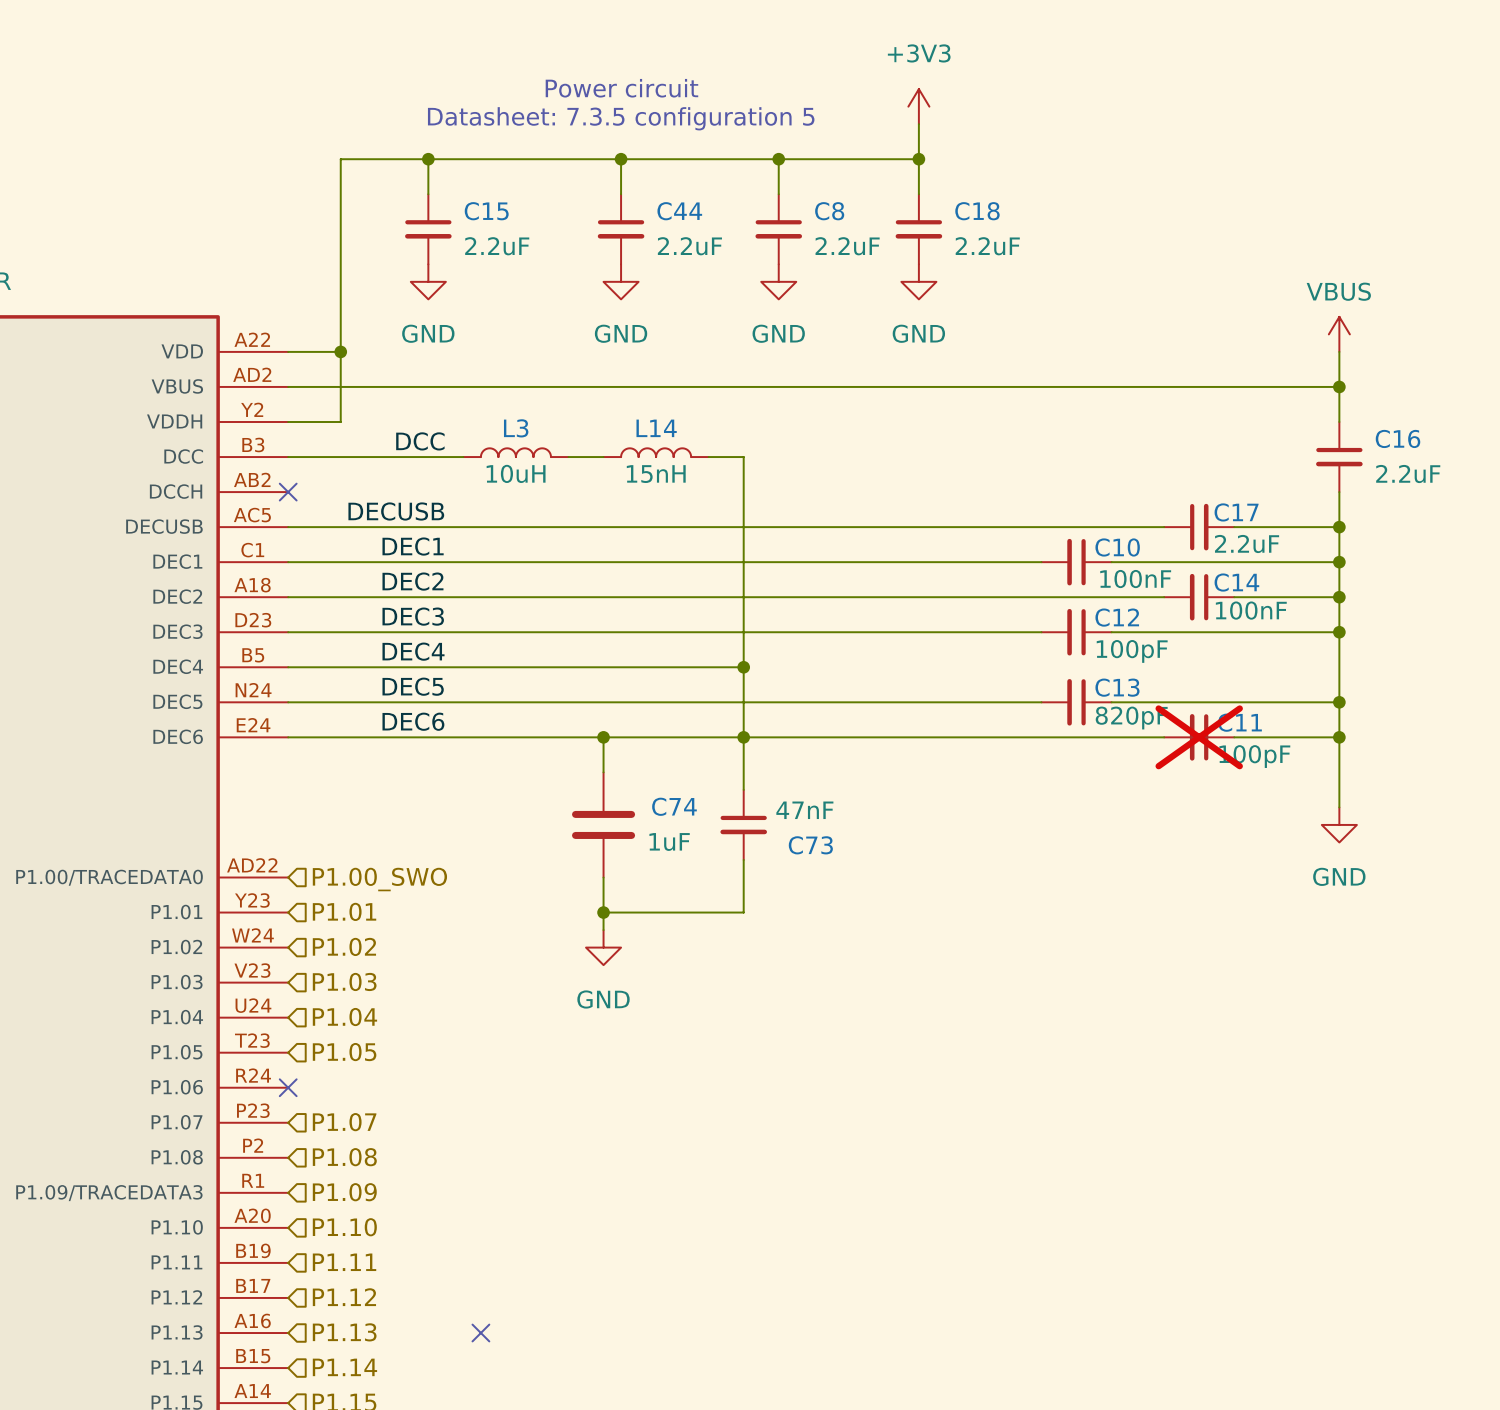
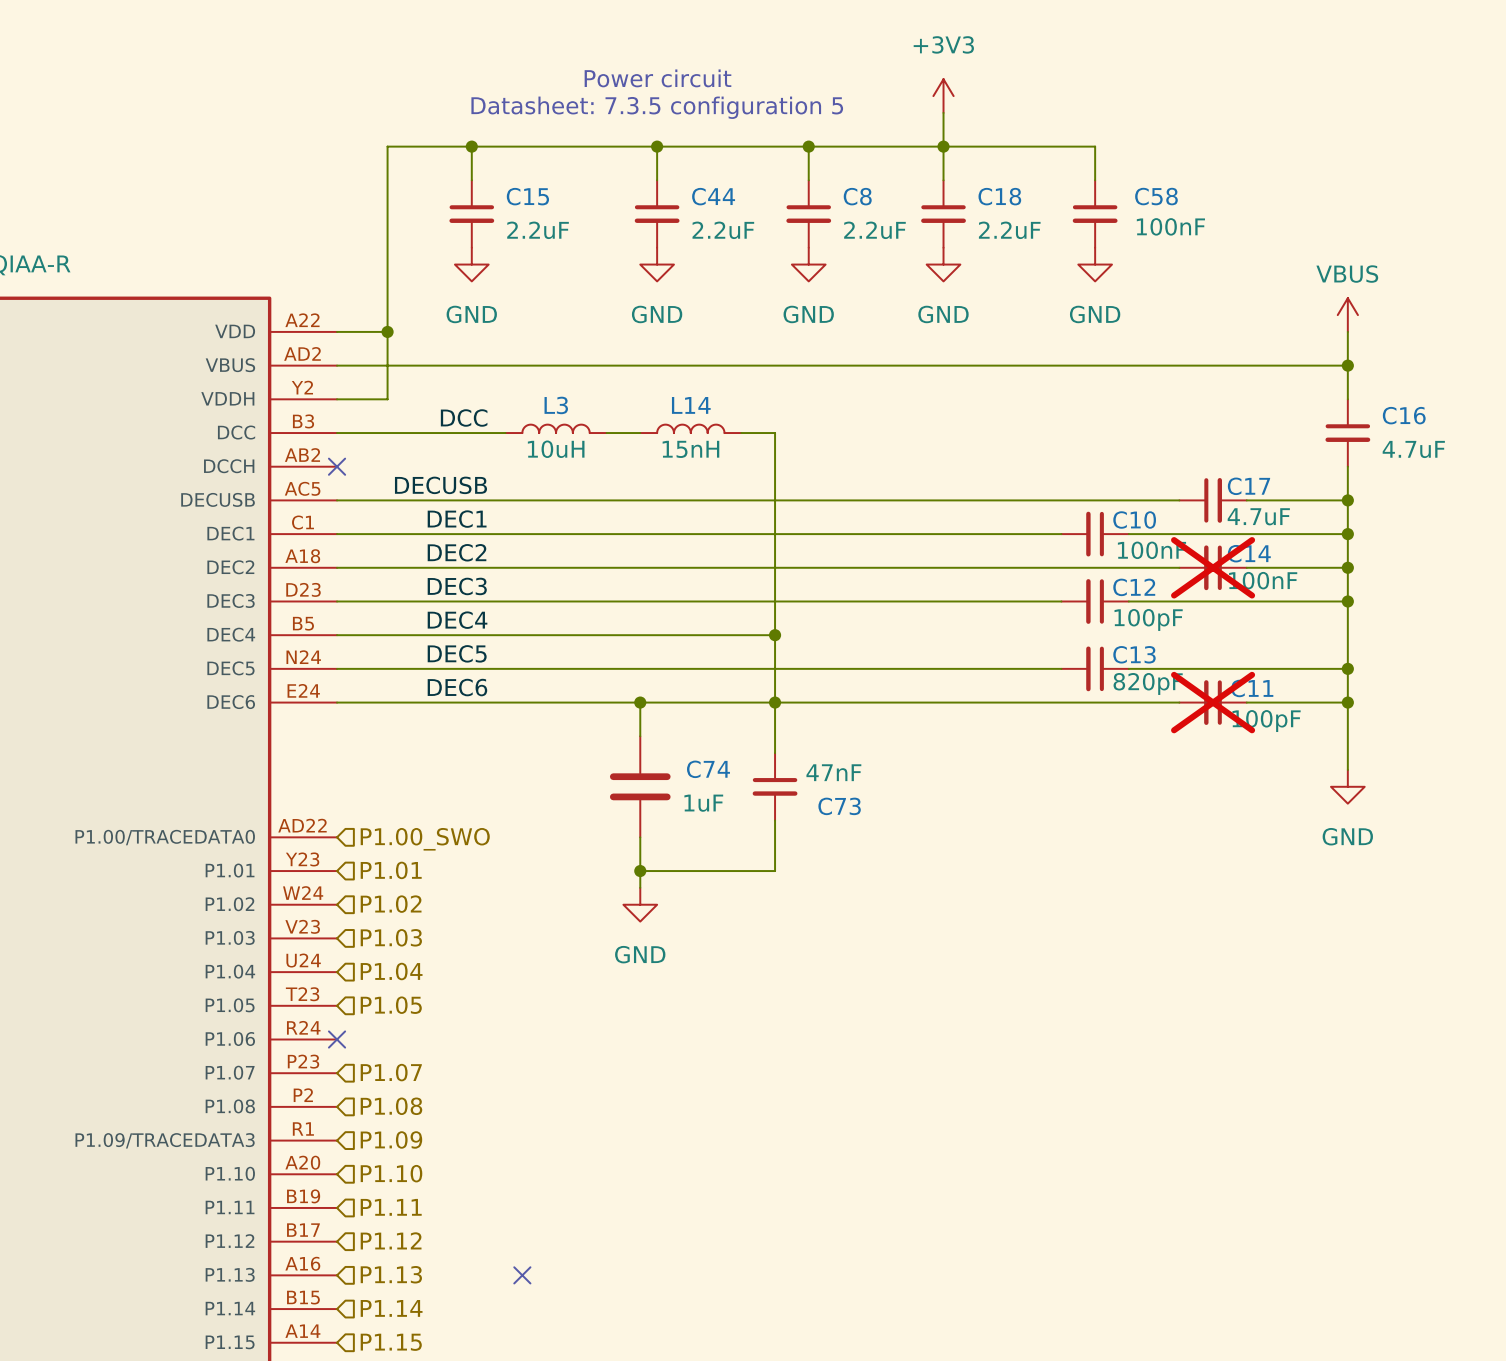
wire: none -> (943, 146) (1095, 146) (1095, 180)
C58: none -> 100nF (1095, 214)
power symbol: none -> GND (1095, 264)
C16 value: 2.2uF (1408, 474) -> 4.7uF (1413, 449)
C17 value: 2.2uF (1247, 543) -> 4.7uF (1258, 516)
C14 do-not-place cross: none -> (1213, 567)

